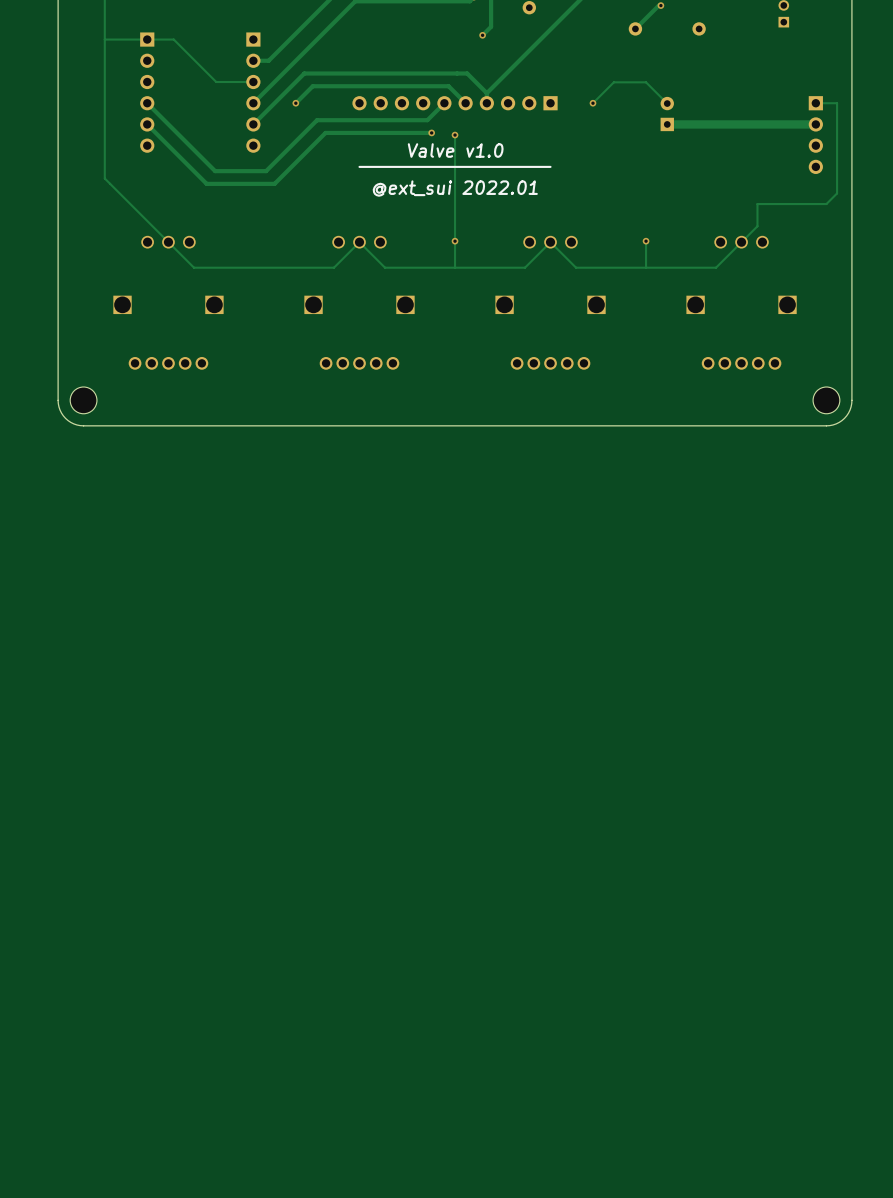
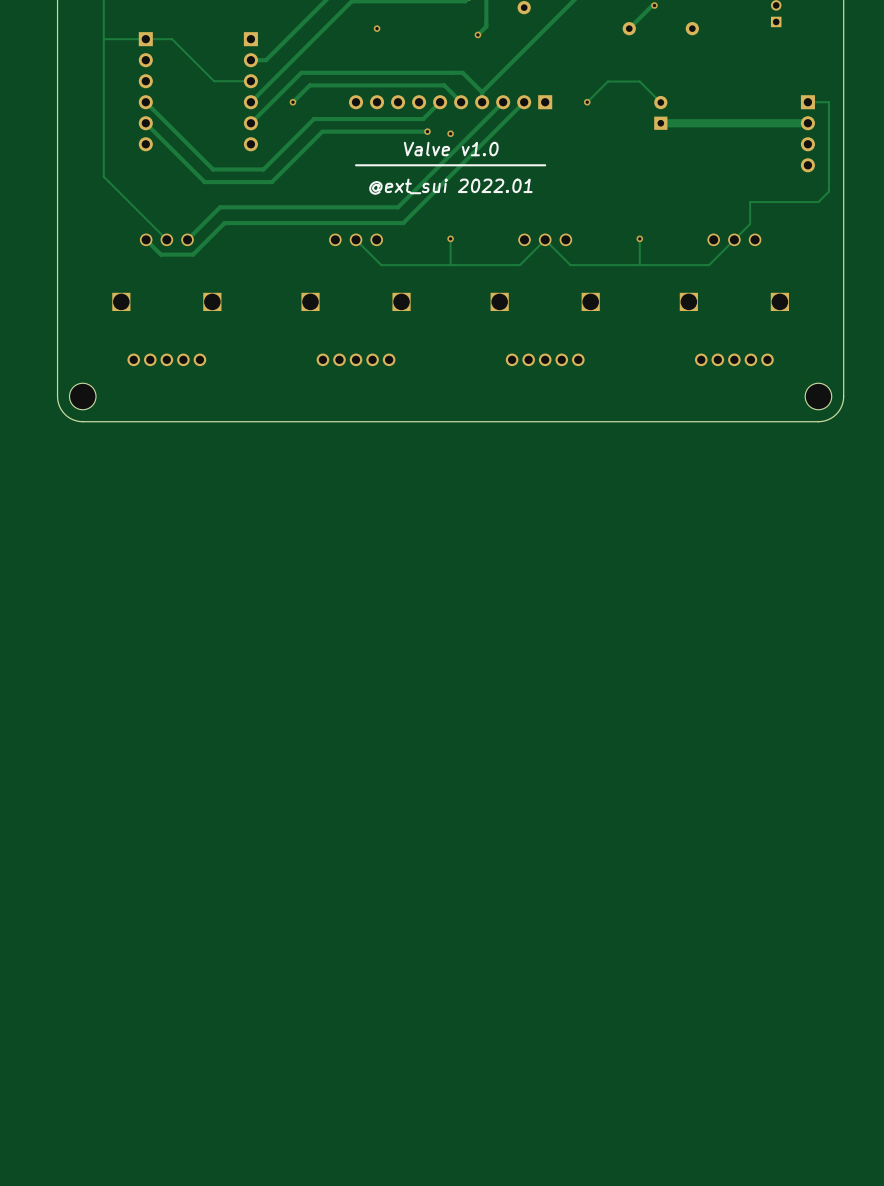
via: none -> (377, 28)
track: none -> (503, 102) (398, 207) (220, 207) (187, 239)
track: none -> (524, 102) (403, 223) (224, 223) (193, 254) (160, 254) (146, 239)
track: (455, 135) (455, 241) -> none
track: (359, 242) (333, 267) (194, 267) (168, 242) -> none

